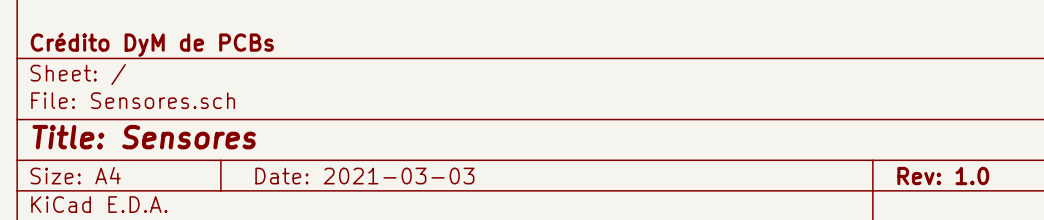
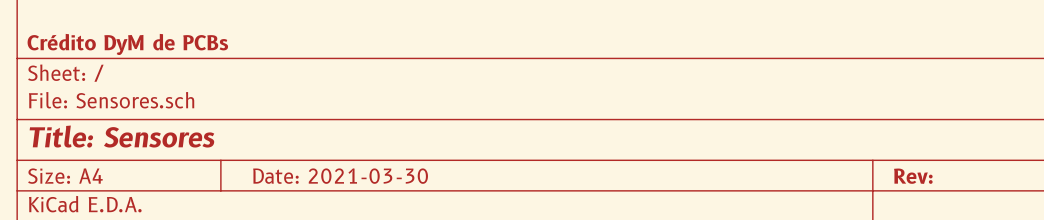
title block: Date: 2021-03-03 (364, 176) -> Date: 2021-03-30 (340, 176)
title block: Rev: 1.0 (943, 176) -> Rev: (913, 176)

